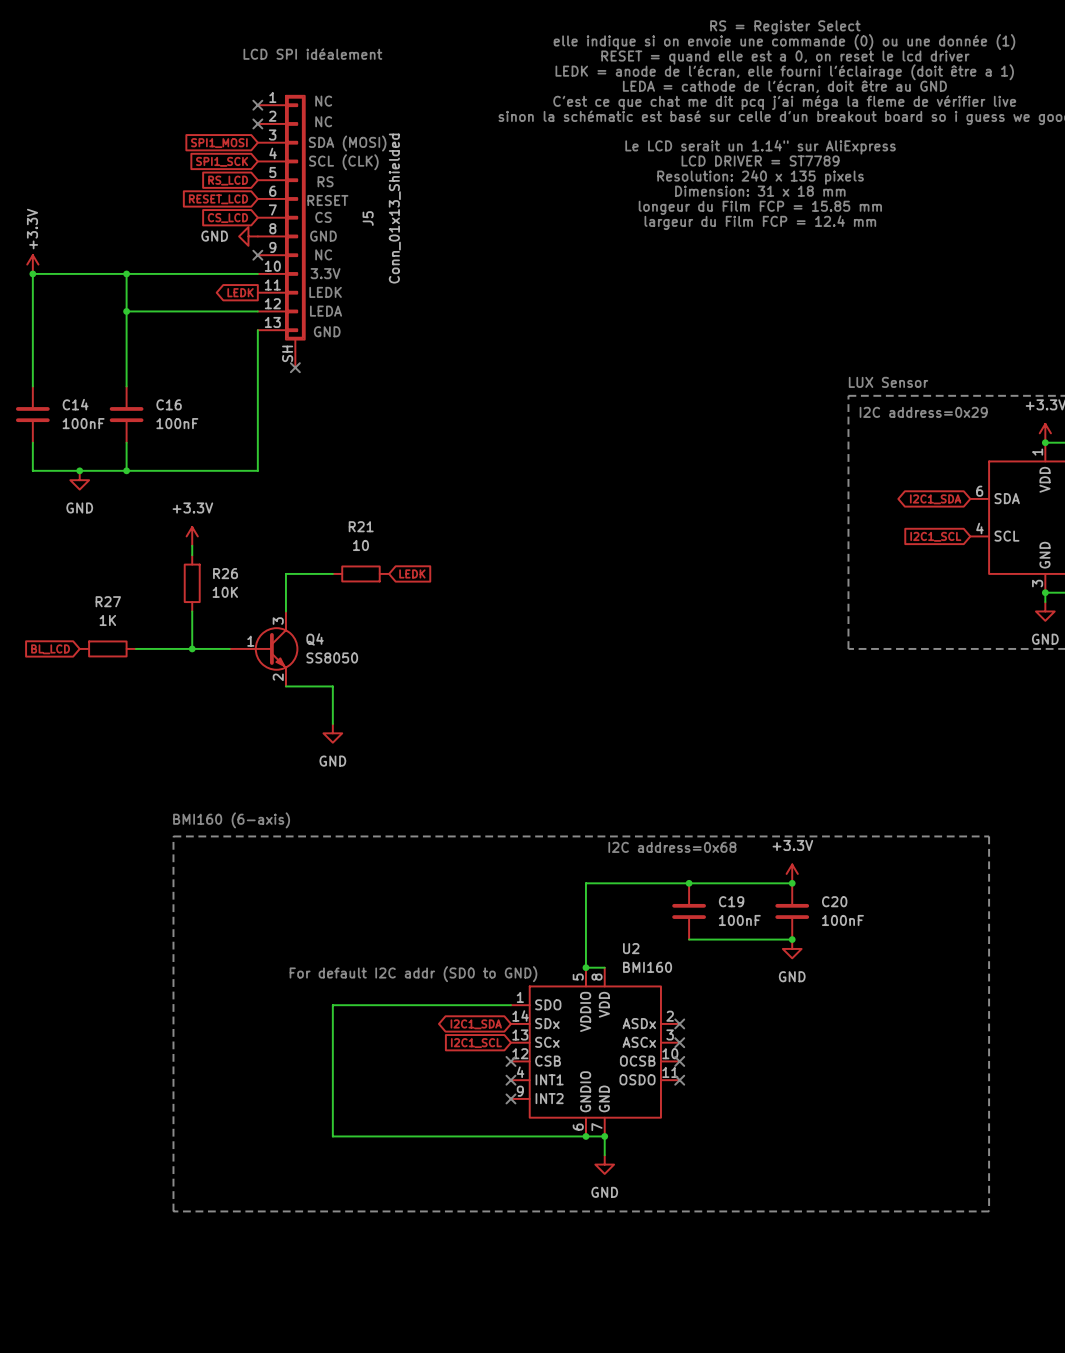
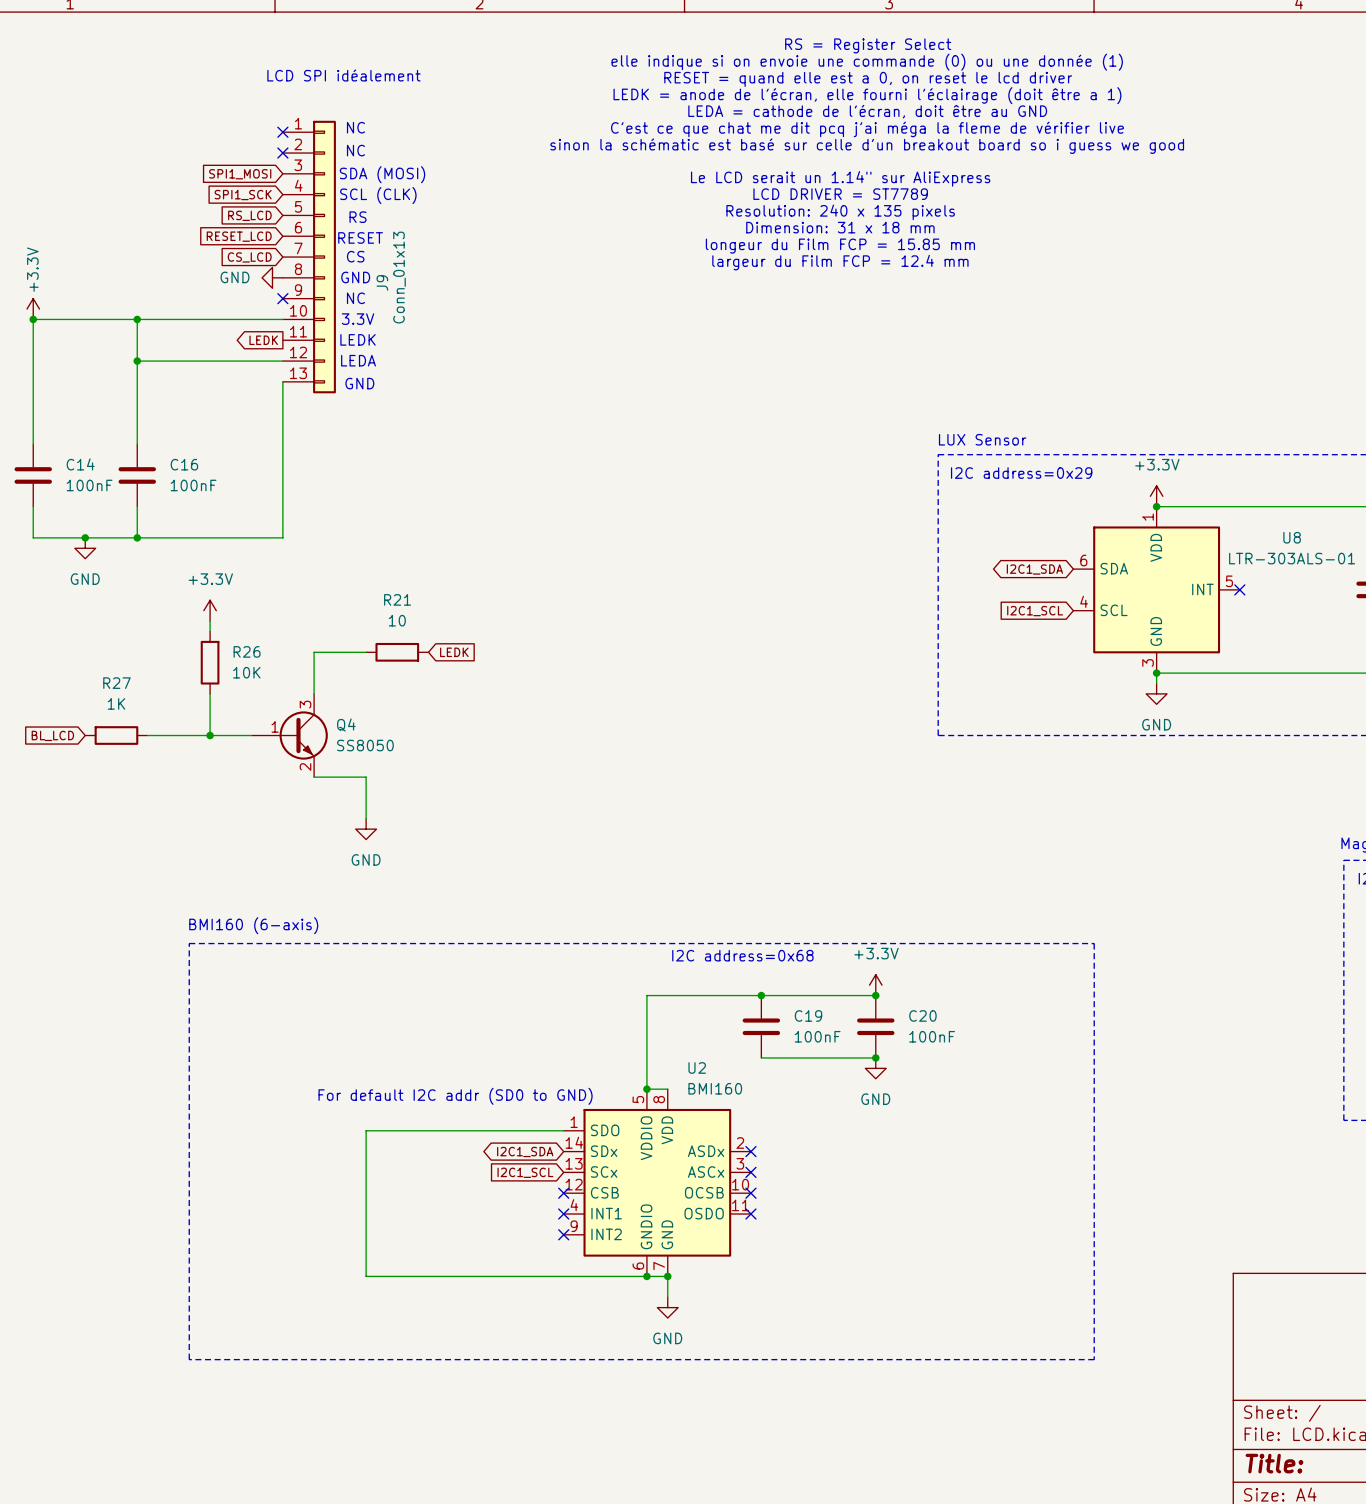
J9: none -> Conn_01x13 (309, 257)
J5: Conn_01x13_Shielded (281, 231) -> none
no-connect mark: (295, 367) -> none

